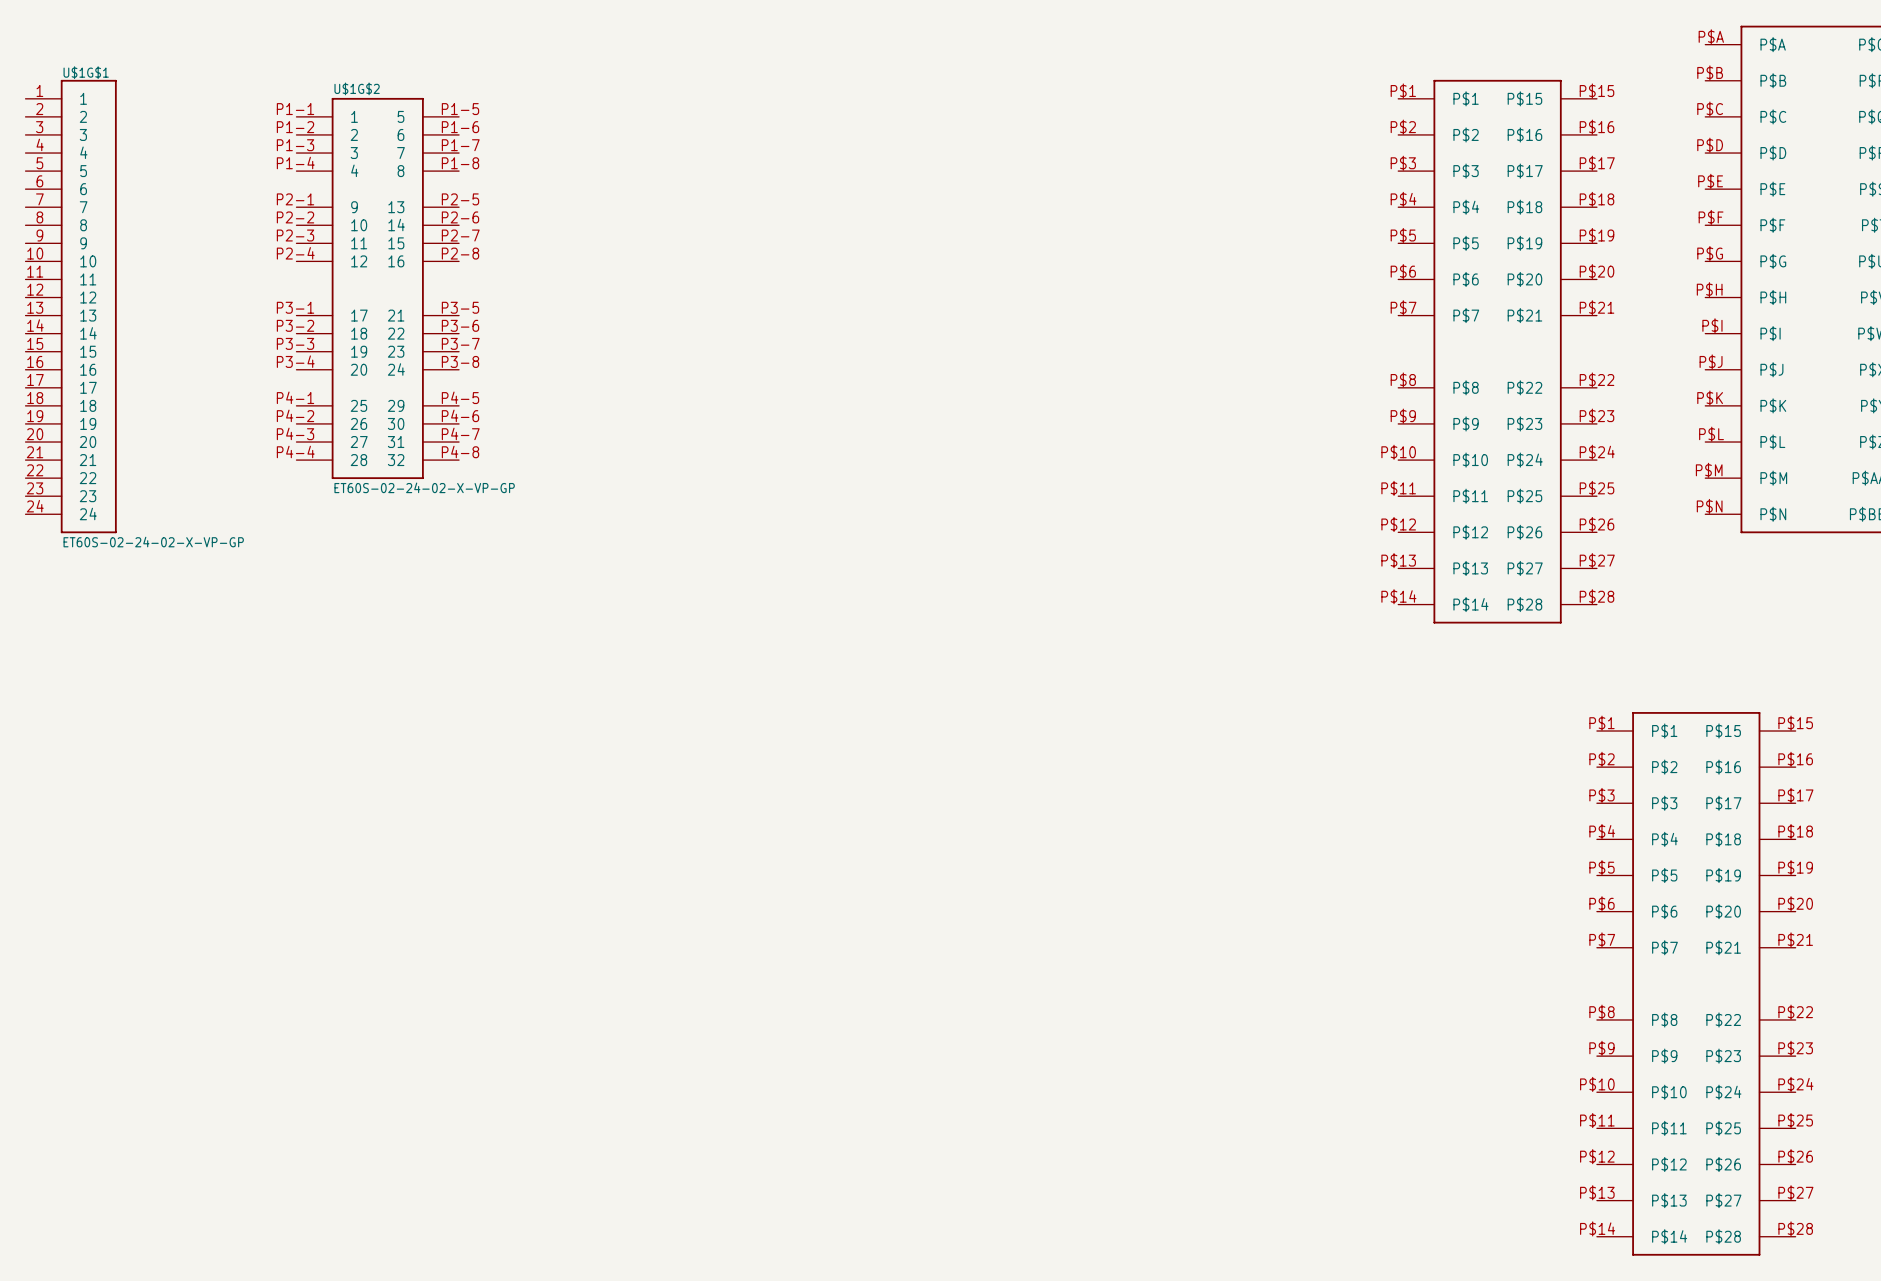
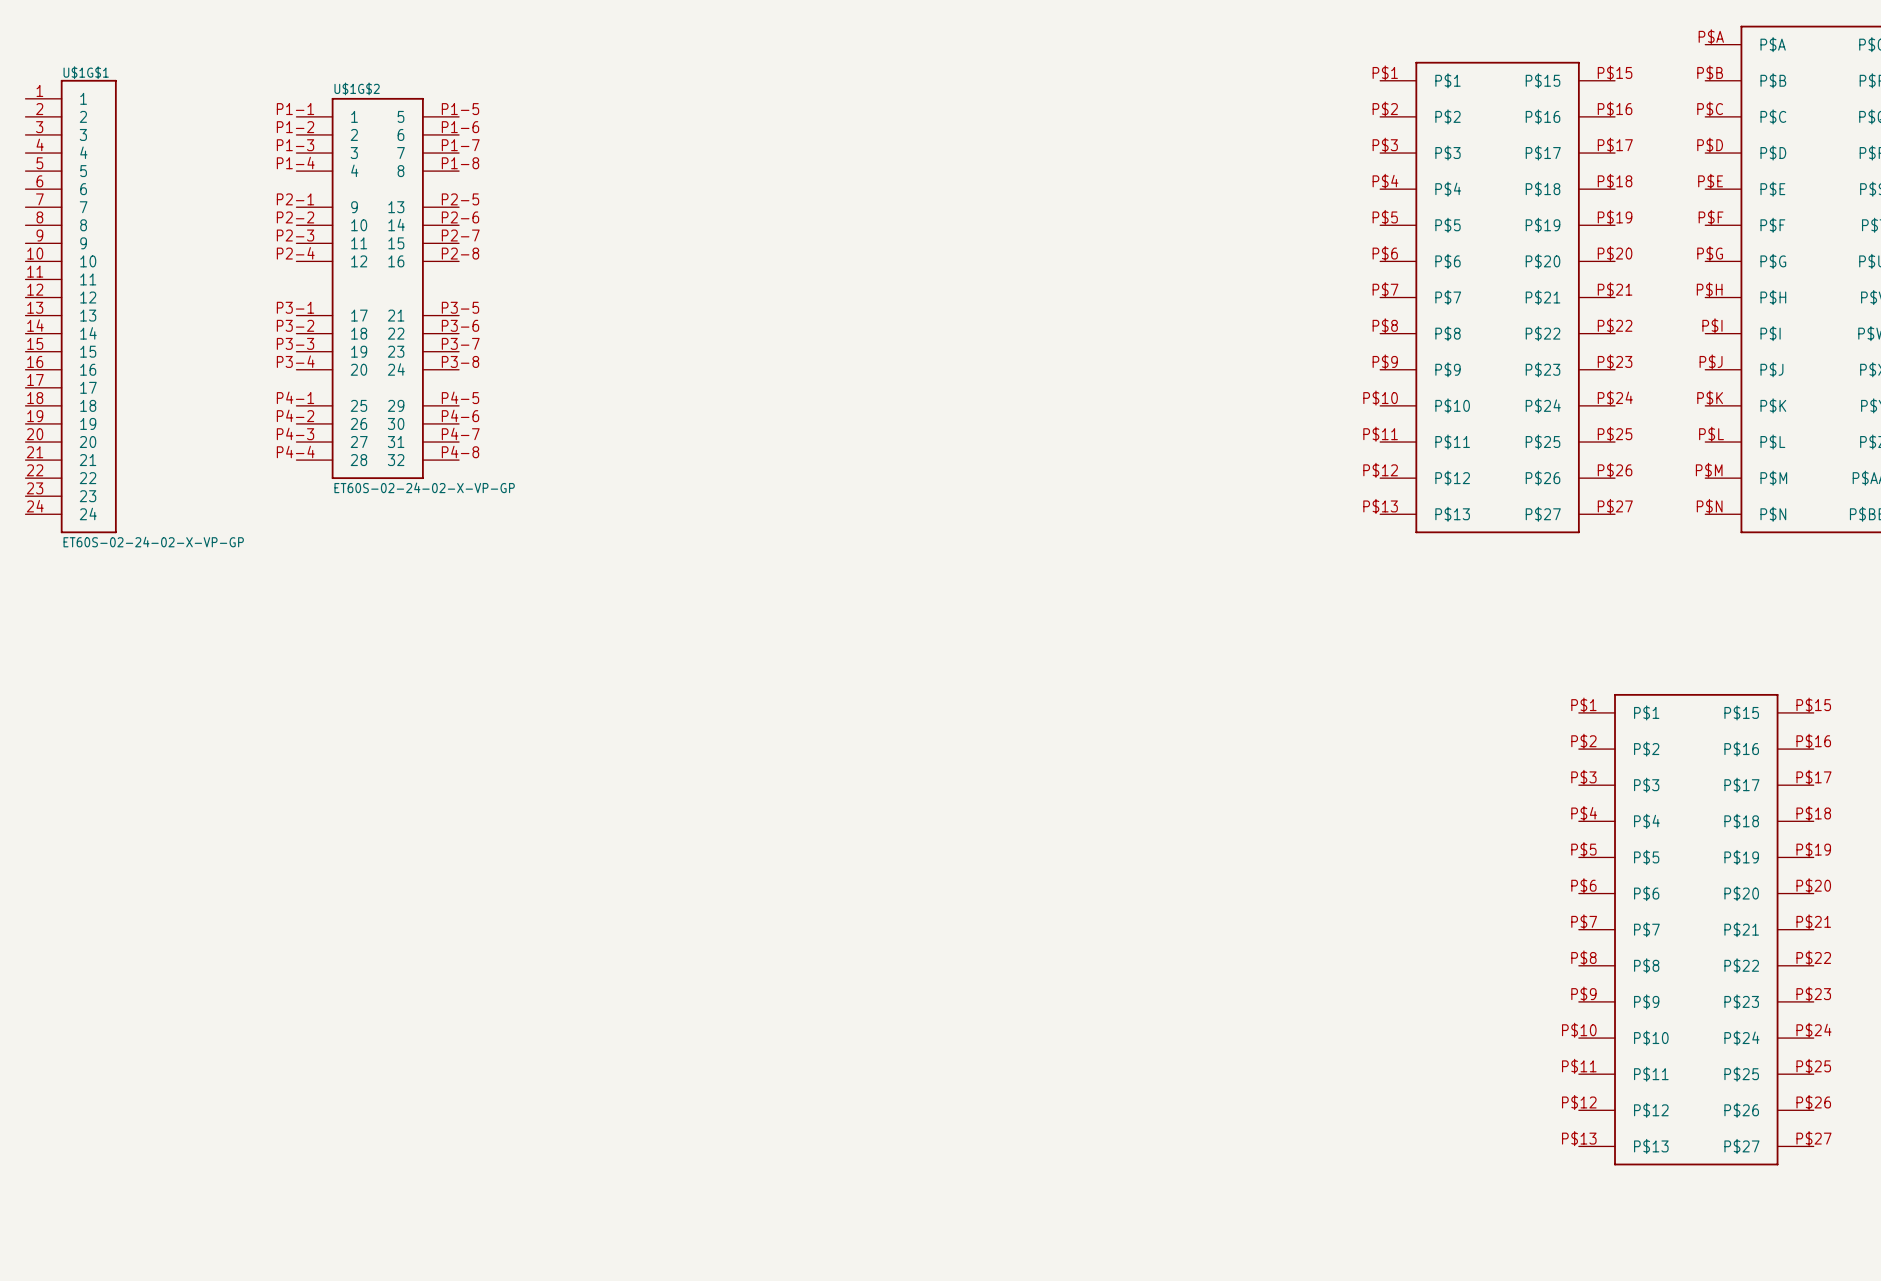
part: none -> (1497, 297)
part: (1497, 351) -> none
part: none -> (1696, 929)
part: (1696, 983) -> none

